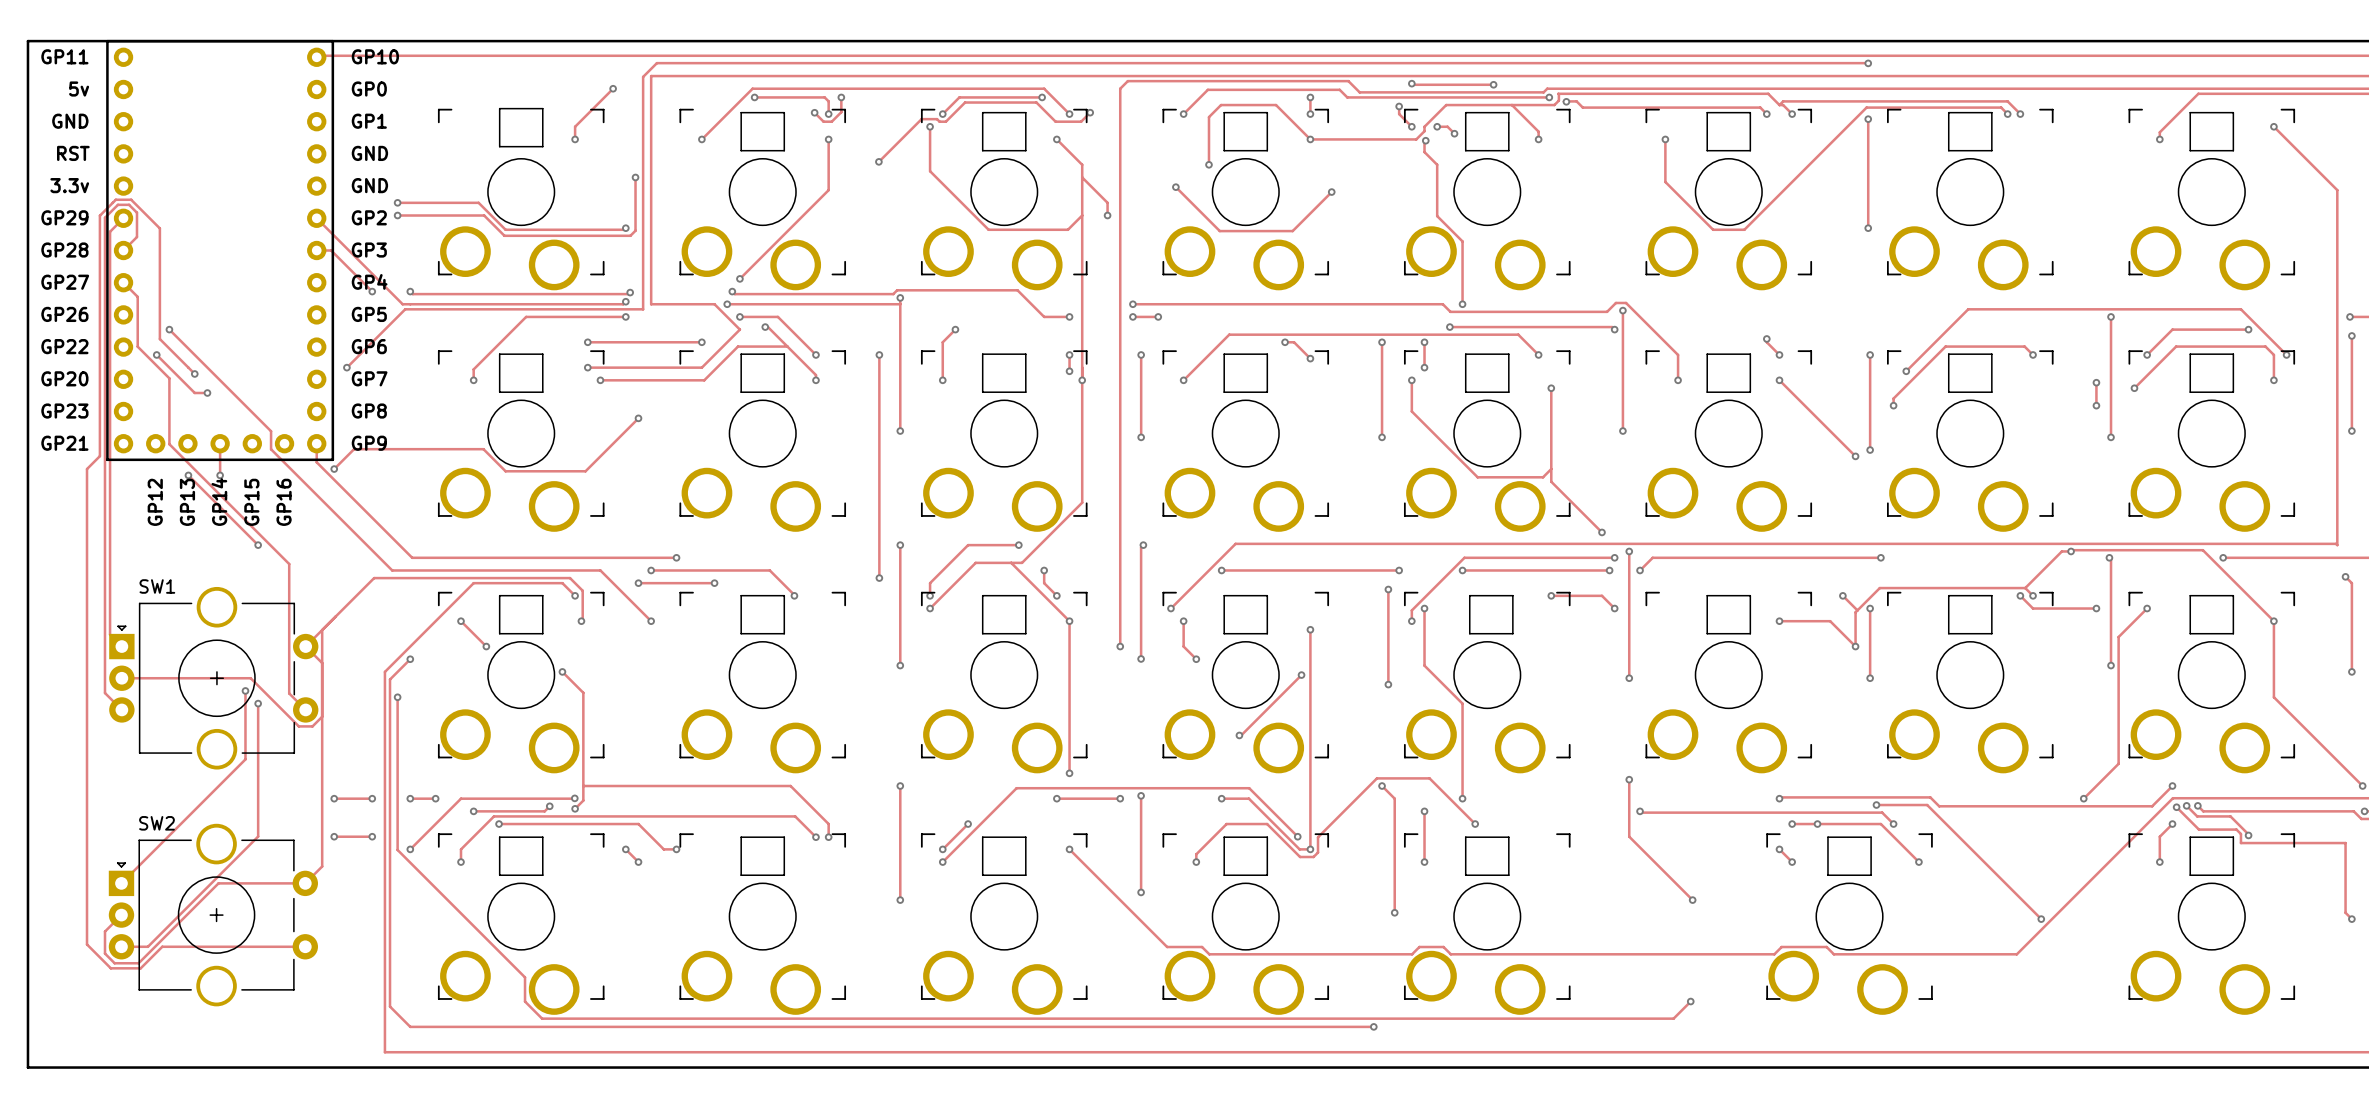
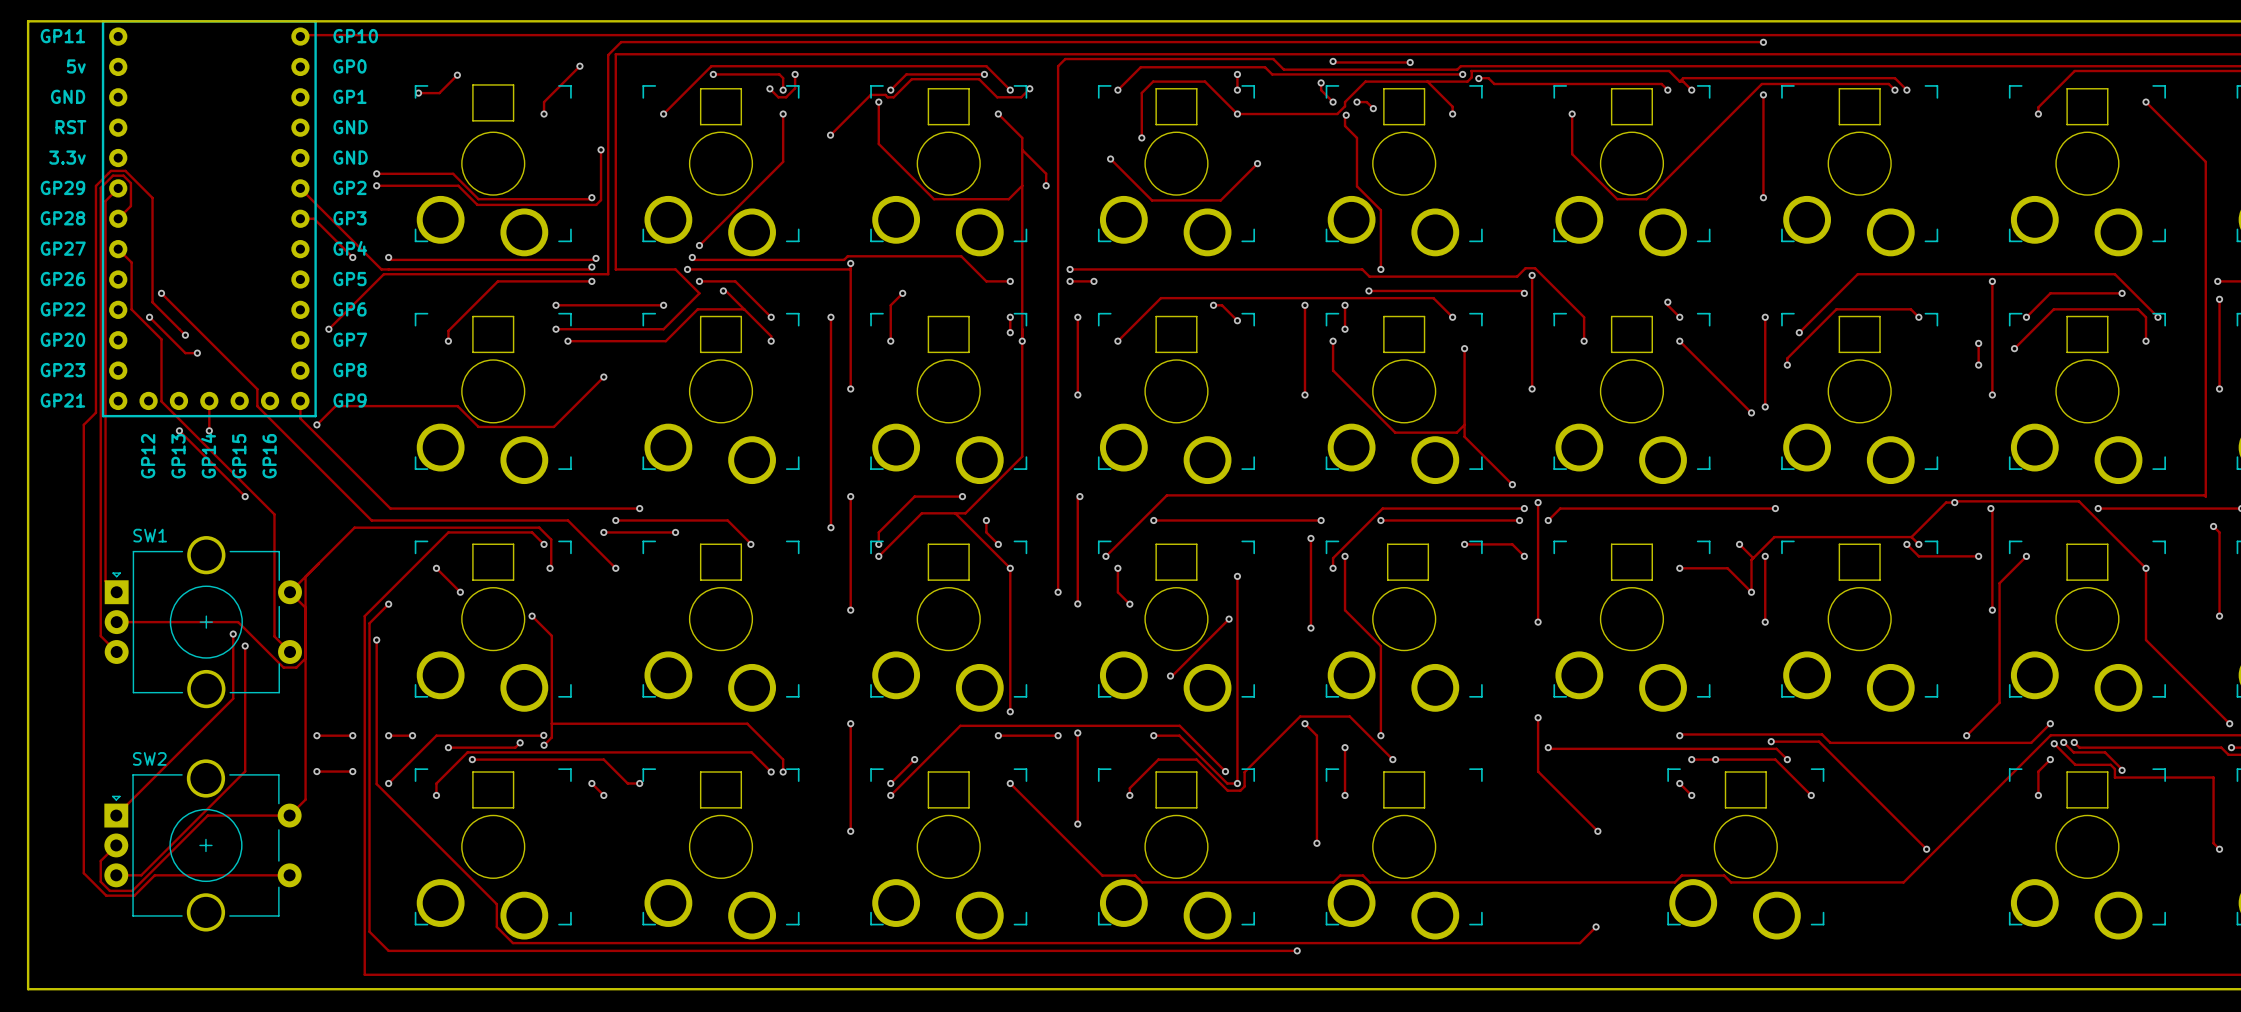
track: none -> (457, 75) (439, 93) (418, 93)
via: none -> (457, 75)
via: none -> (418, 93)

